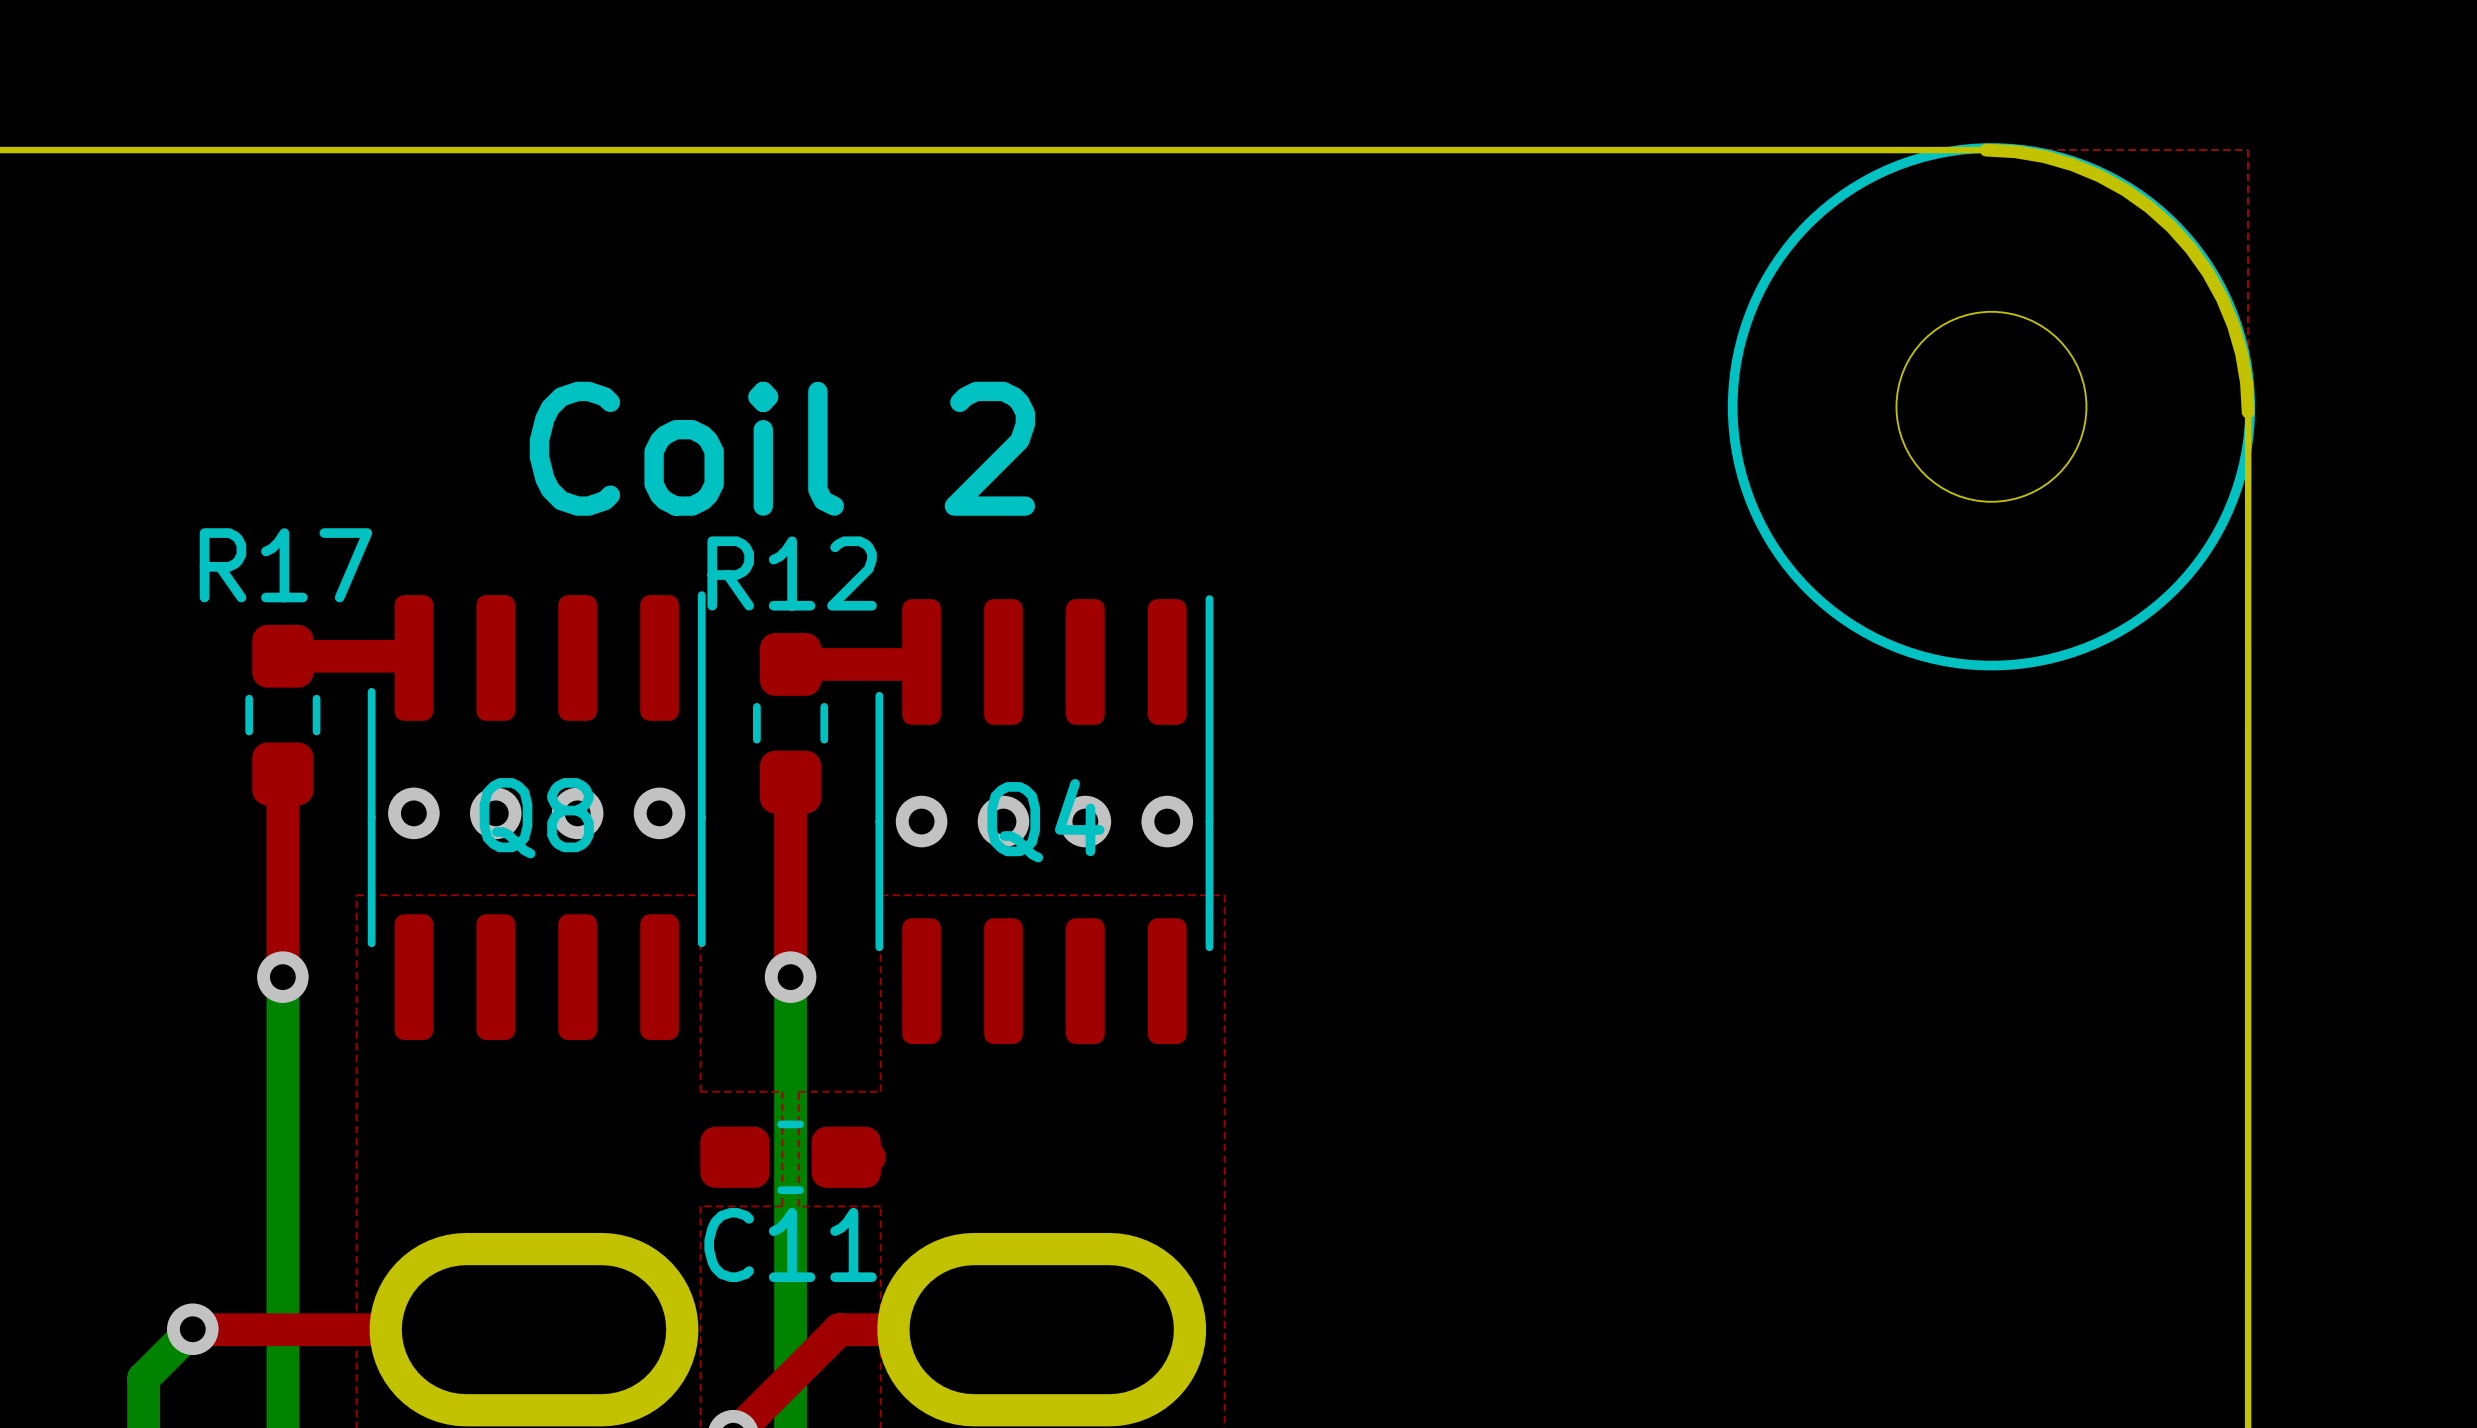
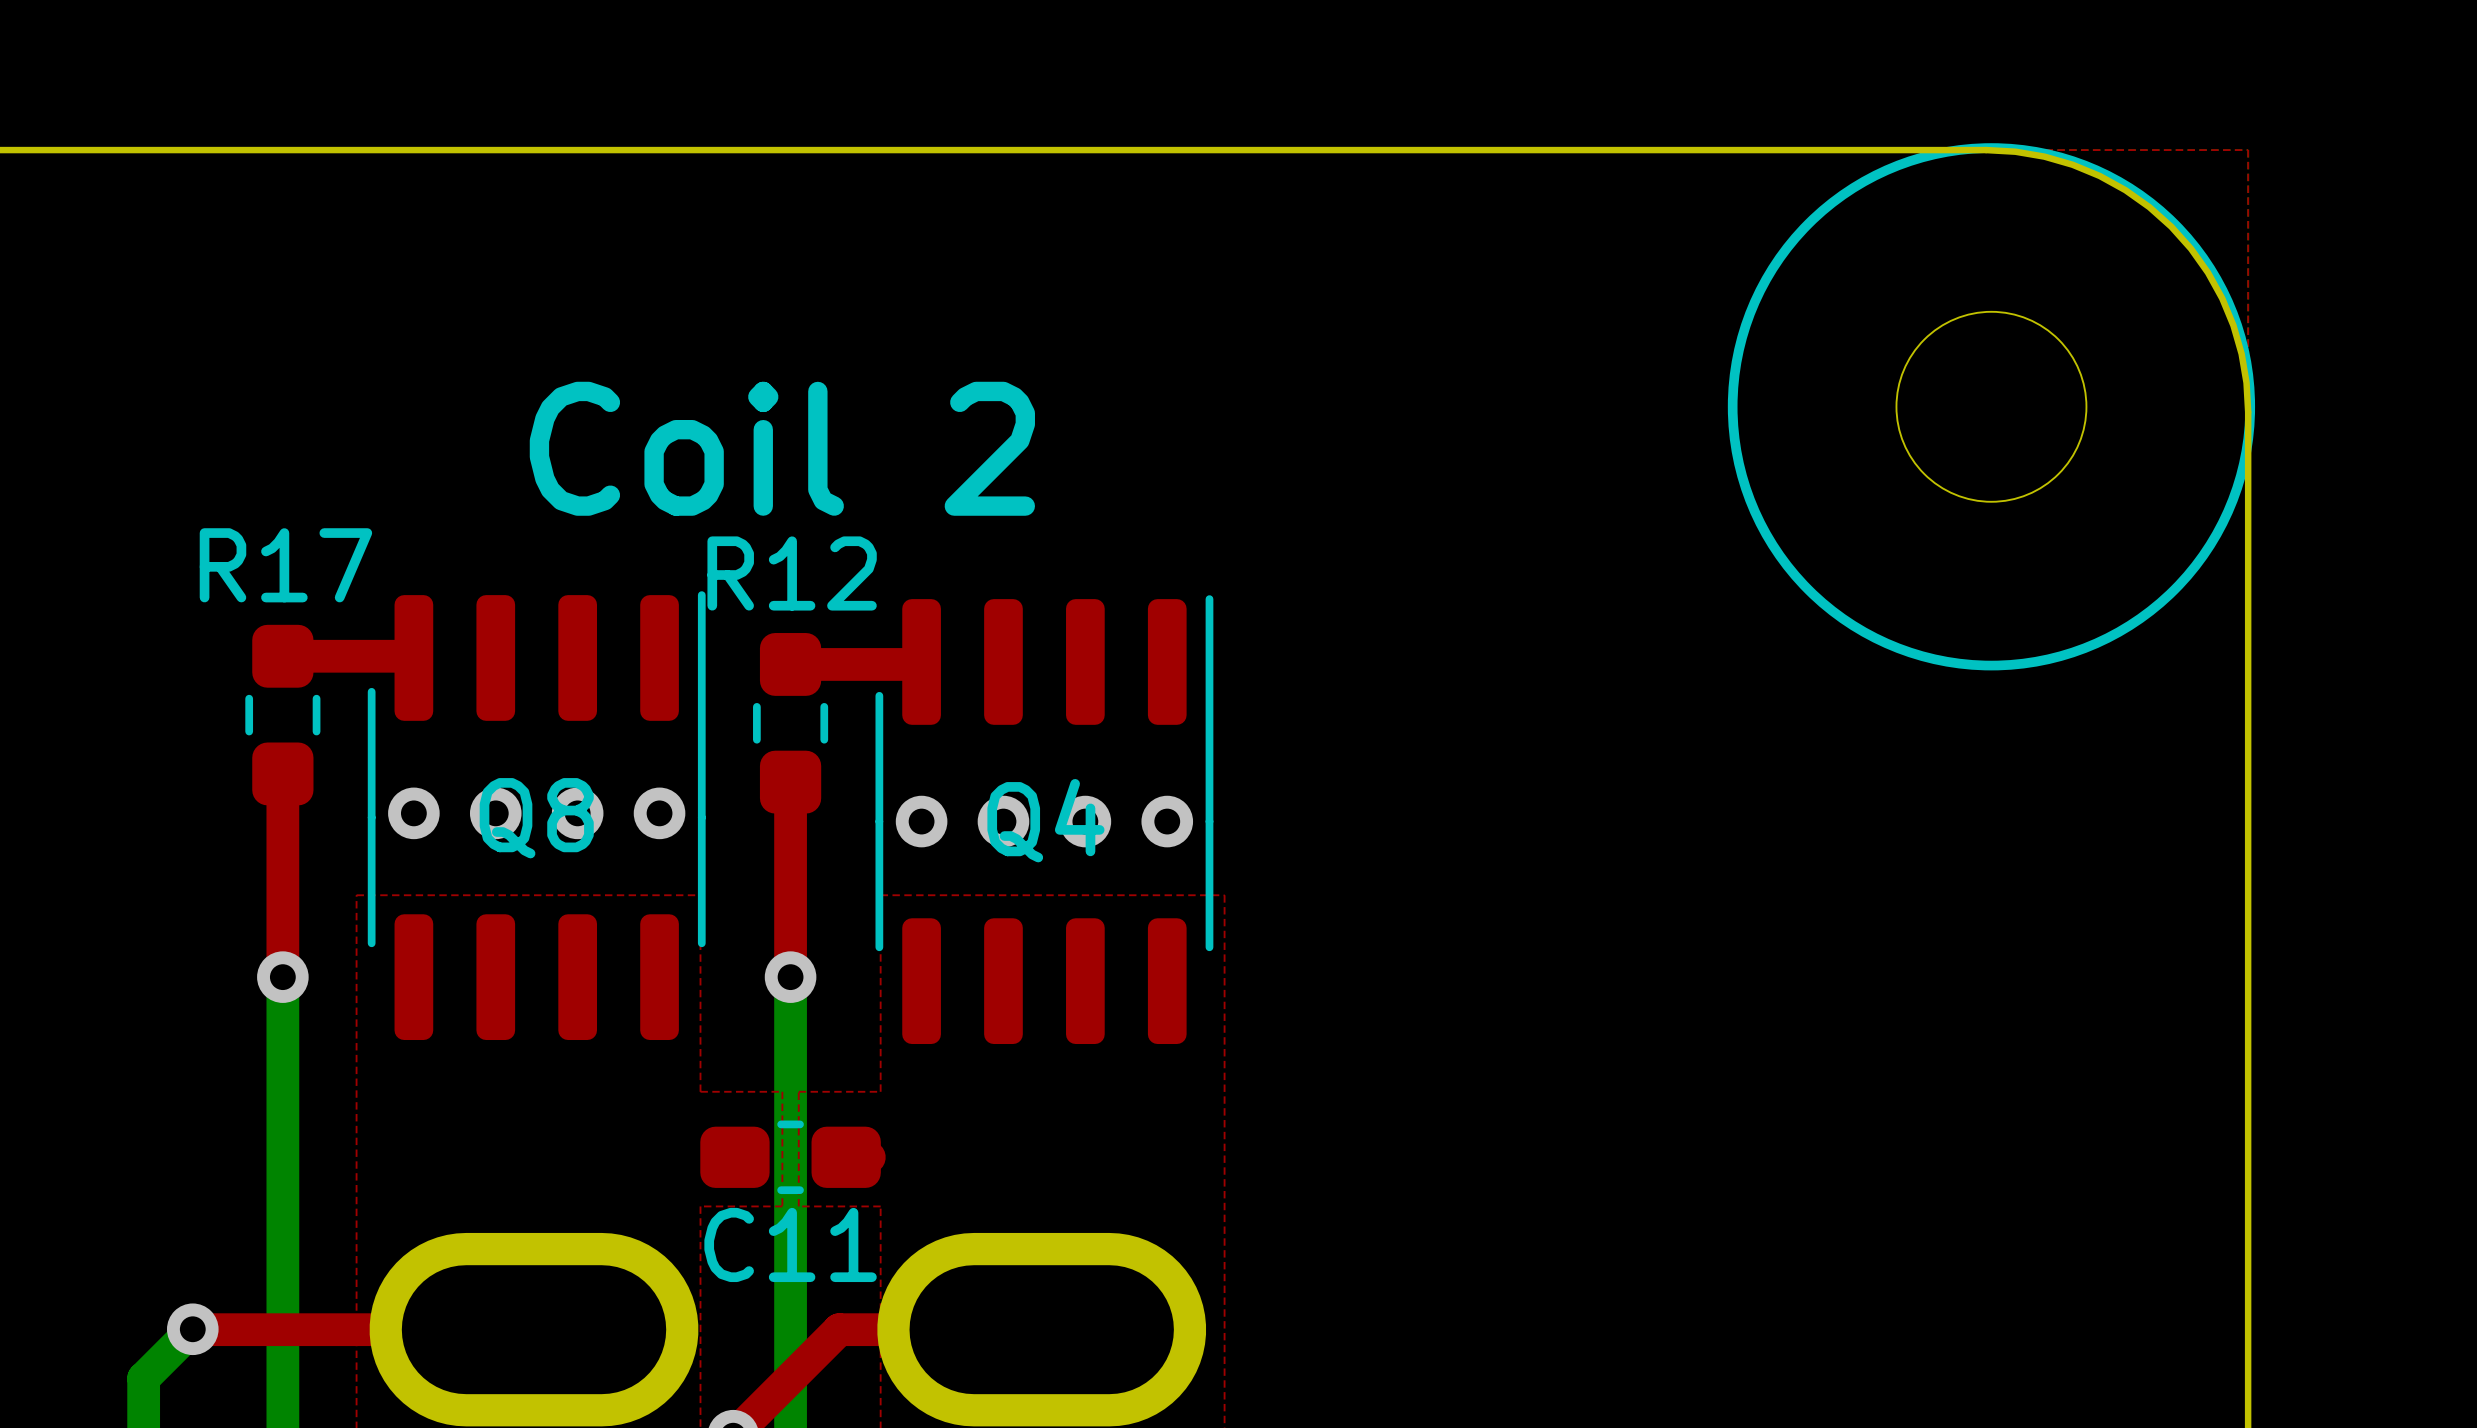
board edge width: thick (1986, 150) (2015, 151) (2044, 156) (2072, 164) (2099, 176) (2125, 190) (2149, 207) (2171, 226) (2191, 248) (2208, 272) (2222, 298) (2233, 325) (2241, 353) (2246, 382) (2248, 412) -> thin (1986, 150) (2015, 151) (2044, 156) (2072, 164) (2099, 176) (2125, 190) (2149, 207) (2171, 226) (2191, 248) (2208, 272) (2222, 298) (2233, 325) (2241, 353) (2246, 382) (2248, 412)

